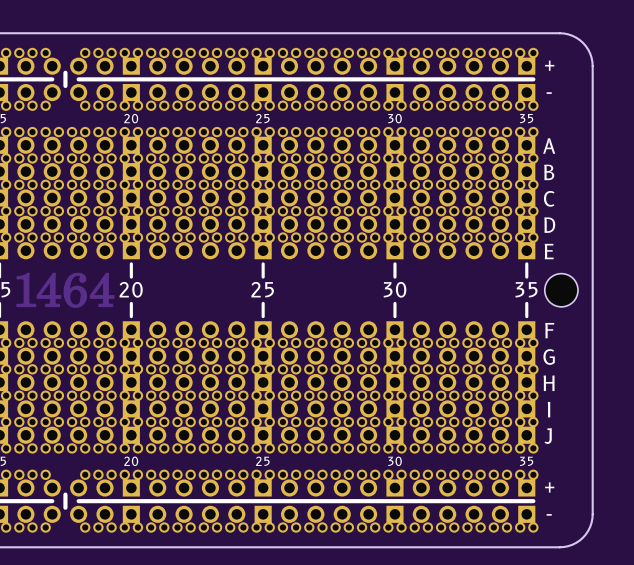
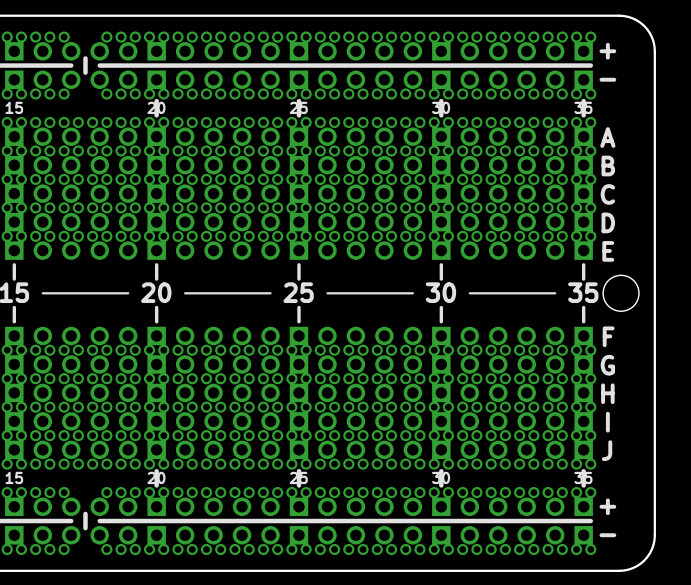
line: none -> (156, 101) (156, 115)
line: none -> (298, 101) (298, 115)
line: none -> (441, 101) (441, 115)
line: none -> (583, 101) (583, 115)
drawing: [16, 272, 115, 308] -> none
line: none -> (42, 293) (128, 293)
line: none -> (185, 293) (270, 293)
line: none -> (327, 293) (412, 293)
line: none -> (469, 293) (555, 293)
line: none -> (156, 471) (156, 485)
line: none -> (298, 471) (298, 485)
line: none -> (441, 471) (441, 485)
line: none -> (583, 471) (583, 485)

